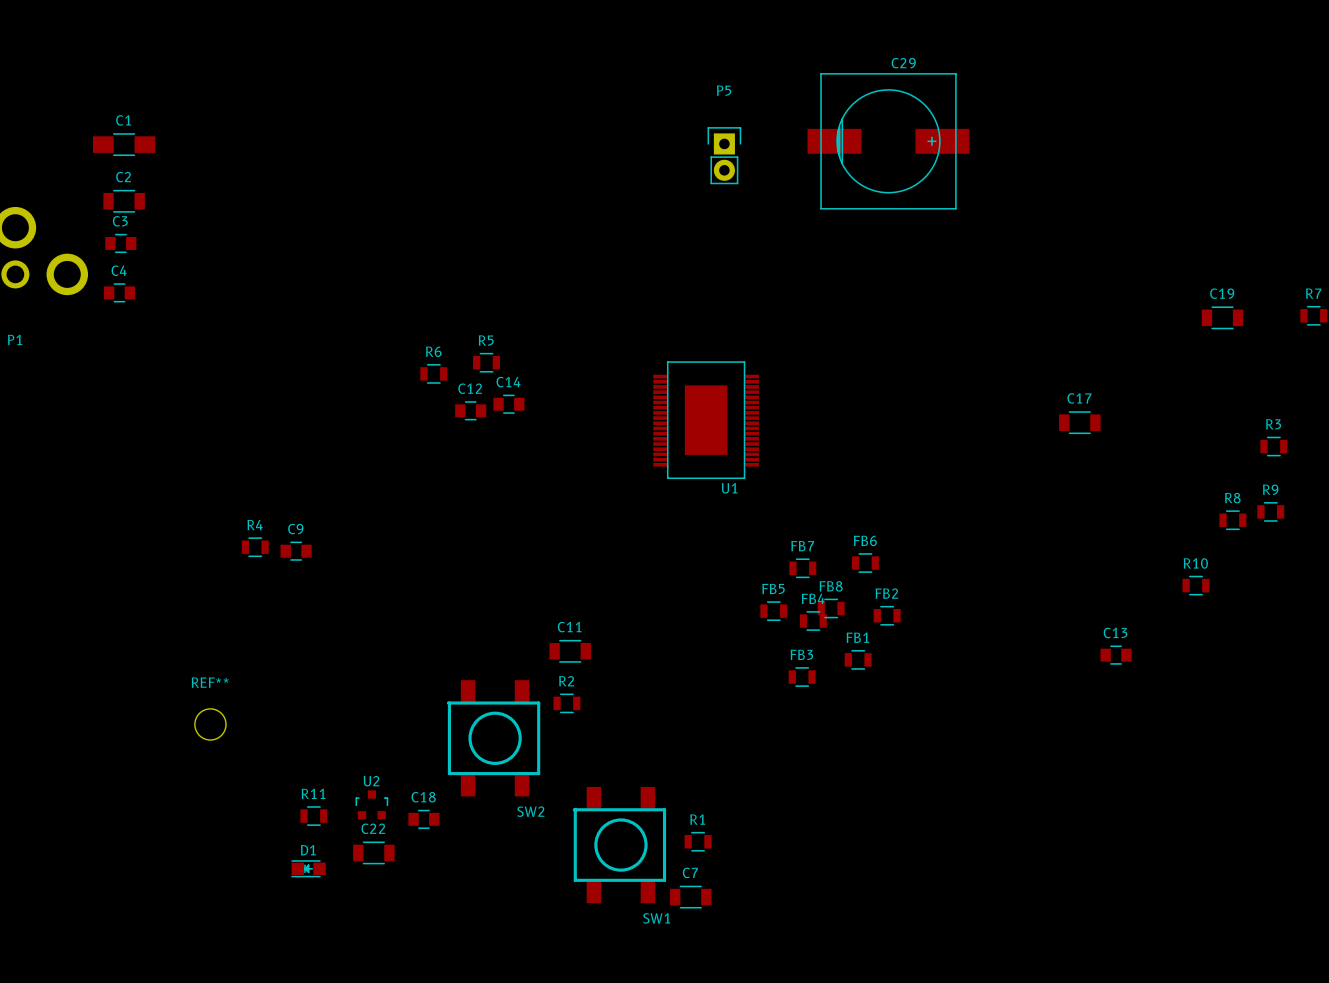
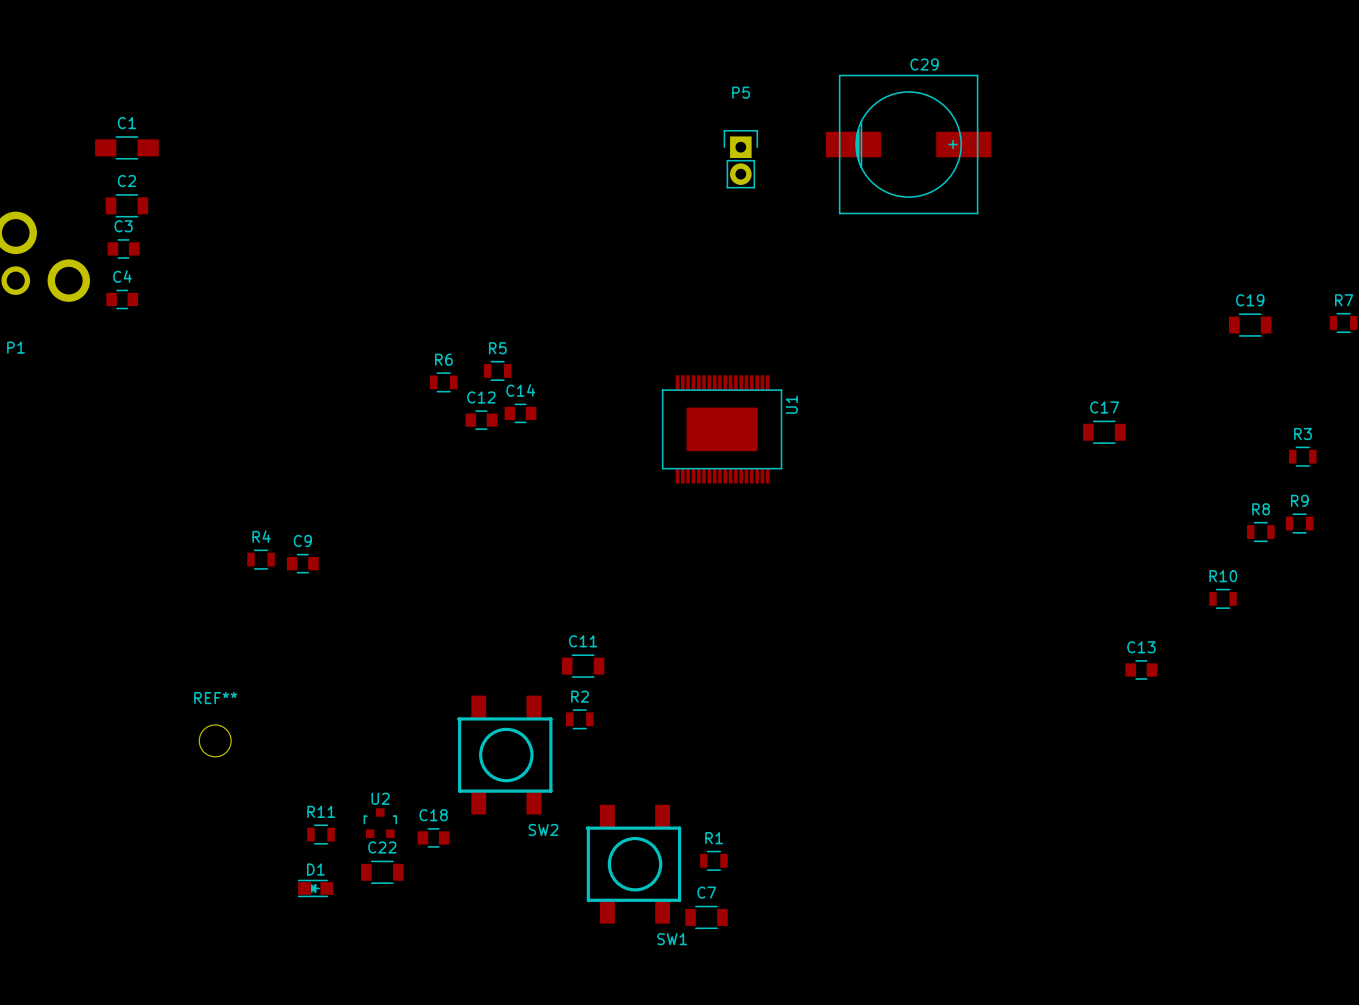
U1 rotation: 0° (706, 420) -> 90° counterclockwise (722, 429)
FB6: (865, 563) -> none
FB7: (802, 568) -> none
FB8: (831, 608) -> none
FB5: (773, 611) -> none
FB2: (887, 615) -> none
FB4: (813, 621) -> none
FB1: (858, 659) -> none
FB3: (802, 677) -> none

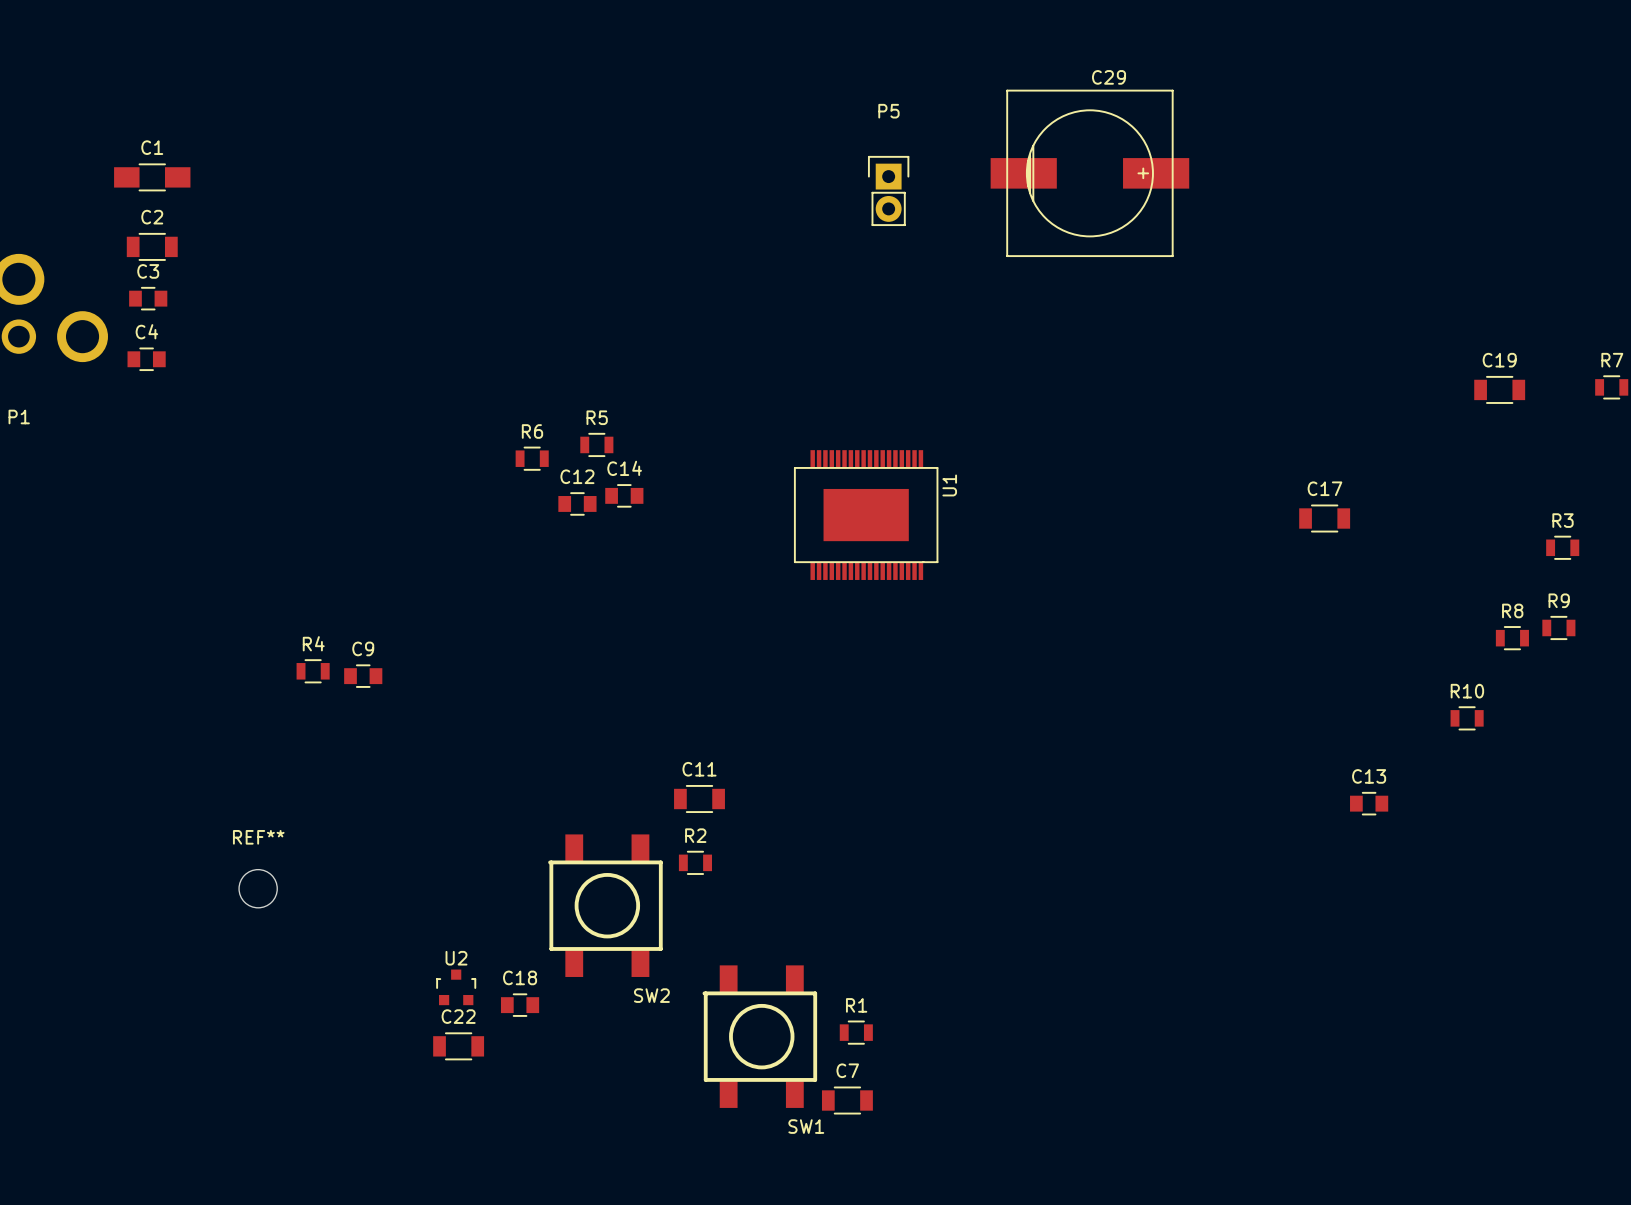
R11: (321, 834) -> none
D1: (315, 888) -> none

